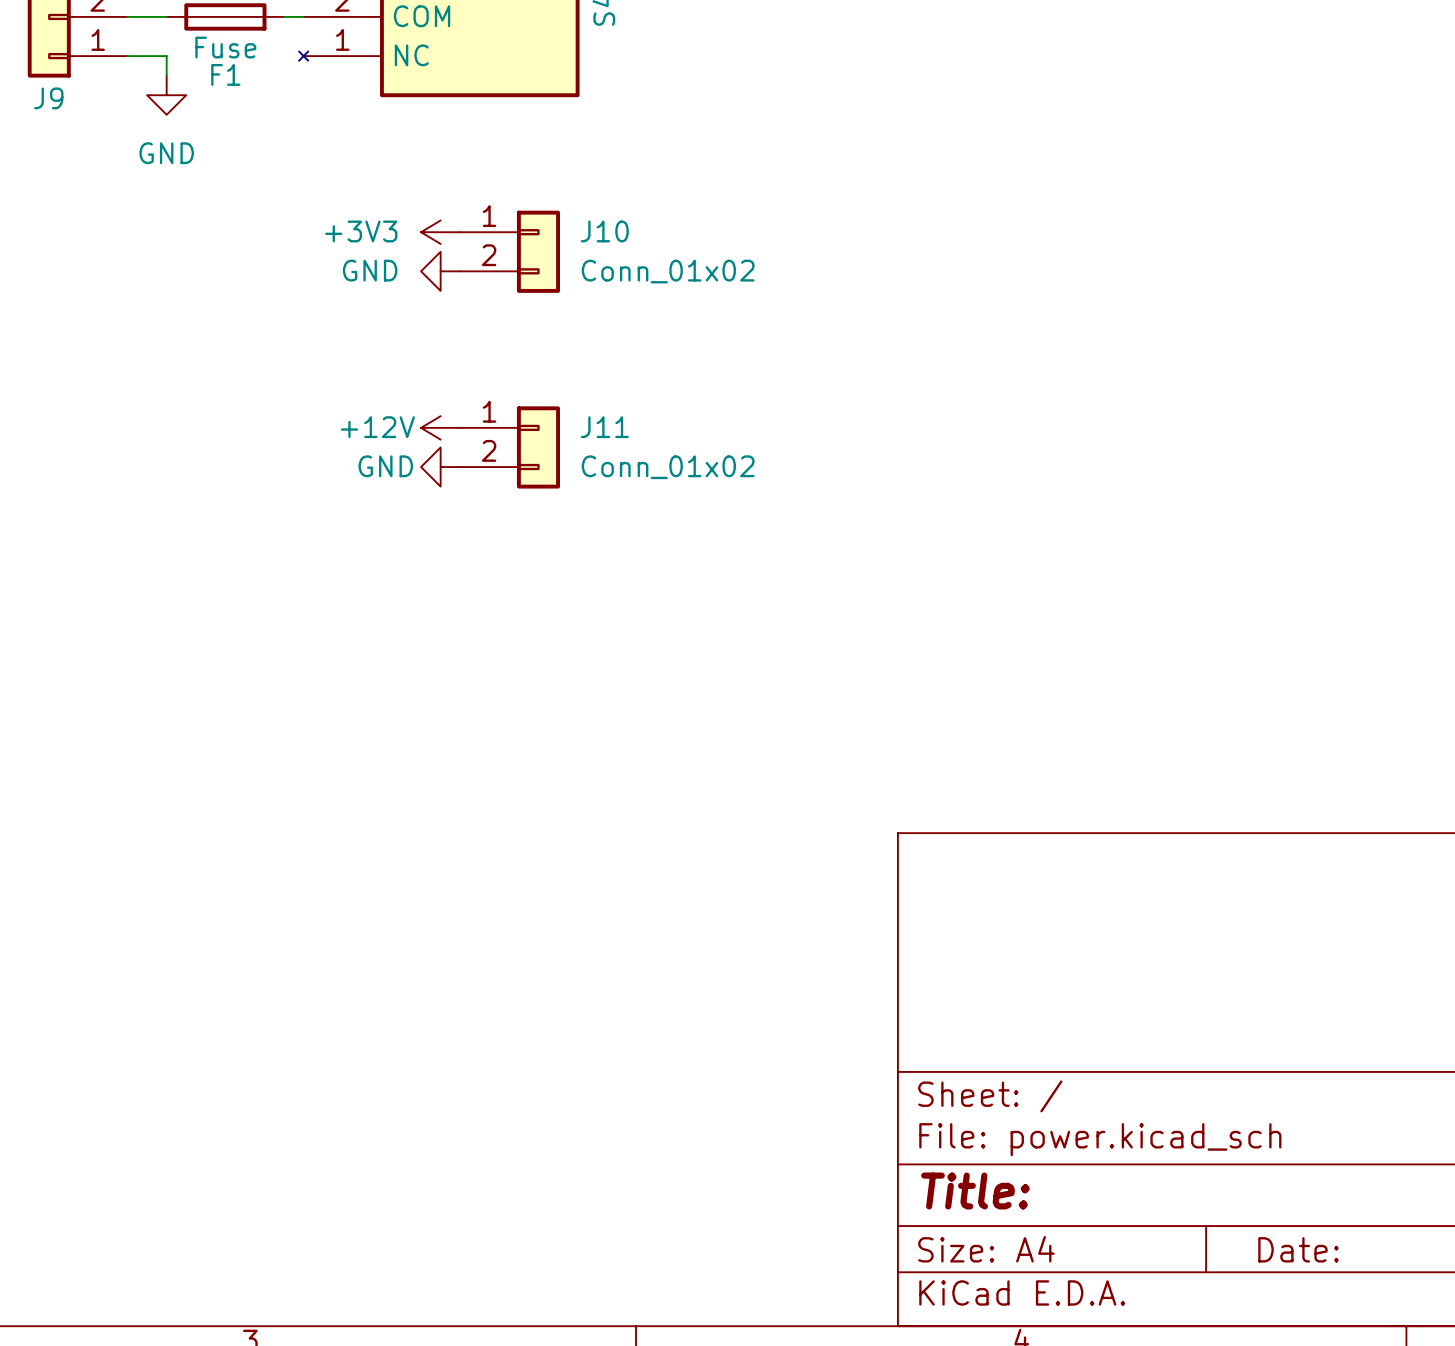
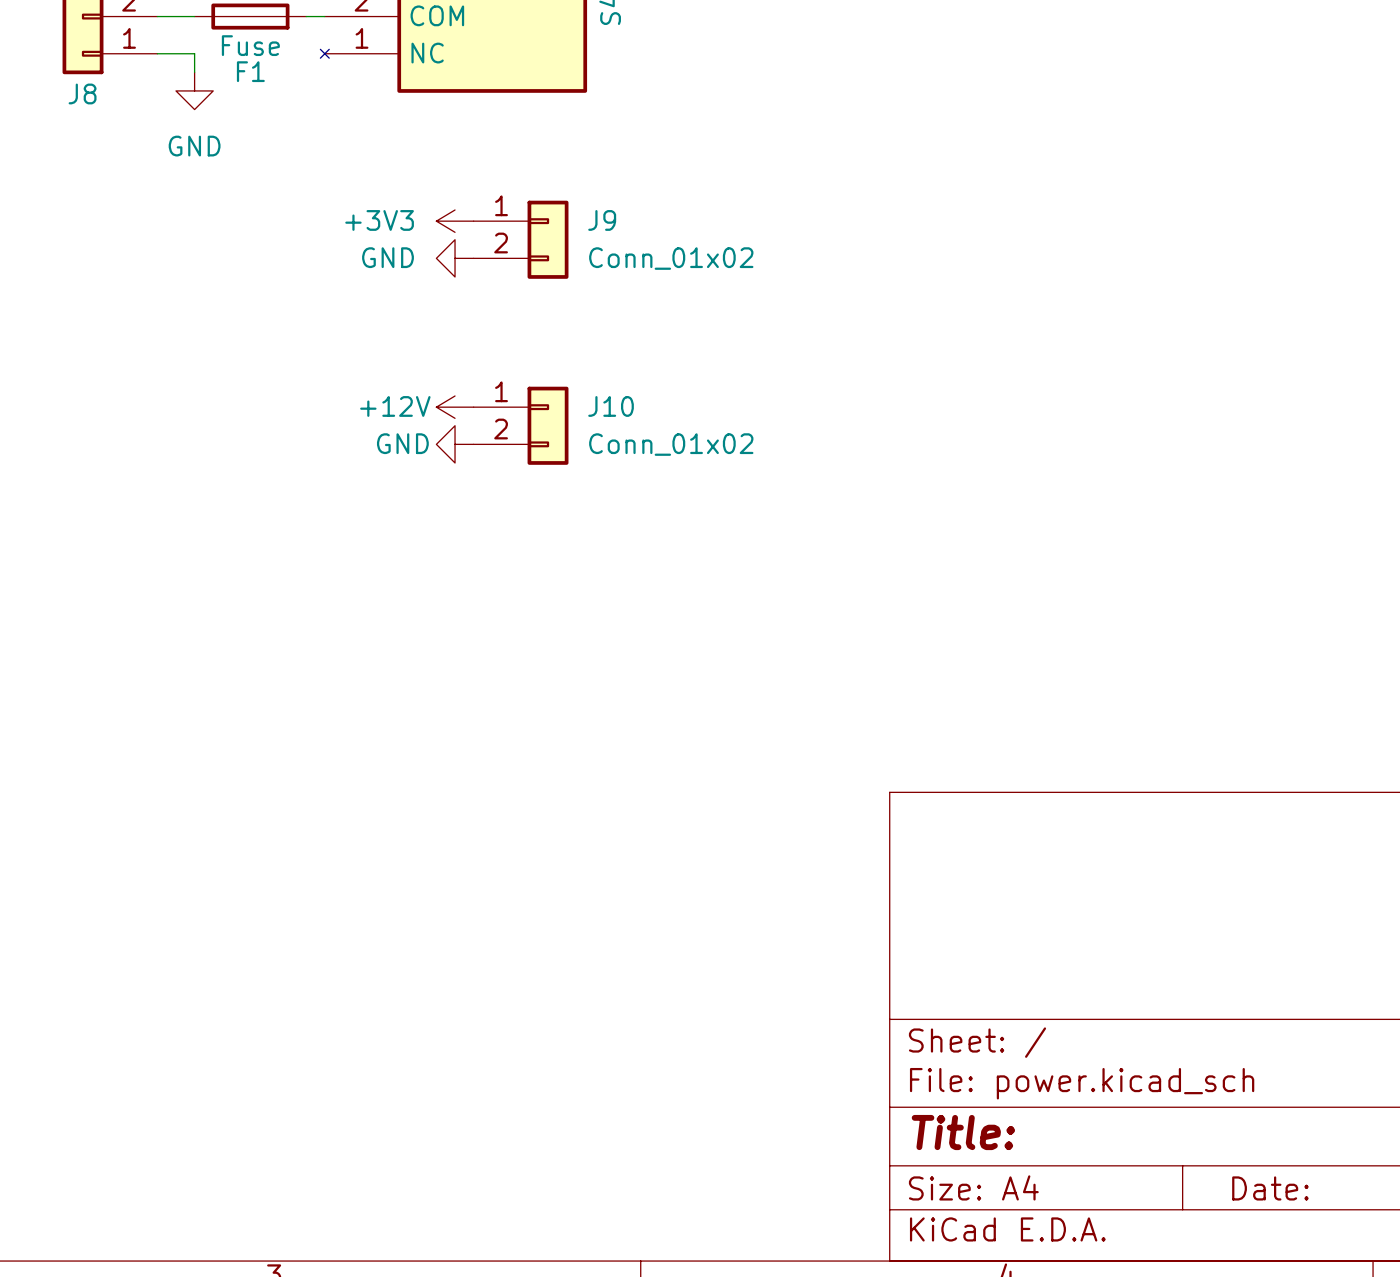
J9 name: J9 (48, 98) -> J8 (82, 93)
J10 name: J10 (604, 231) -> J9 (602, 220)
J11 name: J11 (604, 427) -> J10 (611, 406)

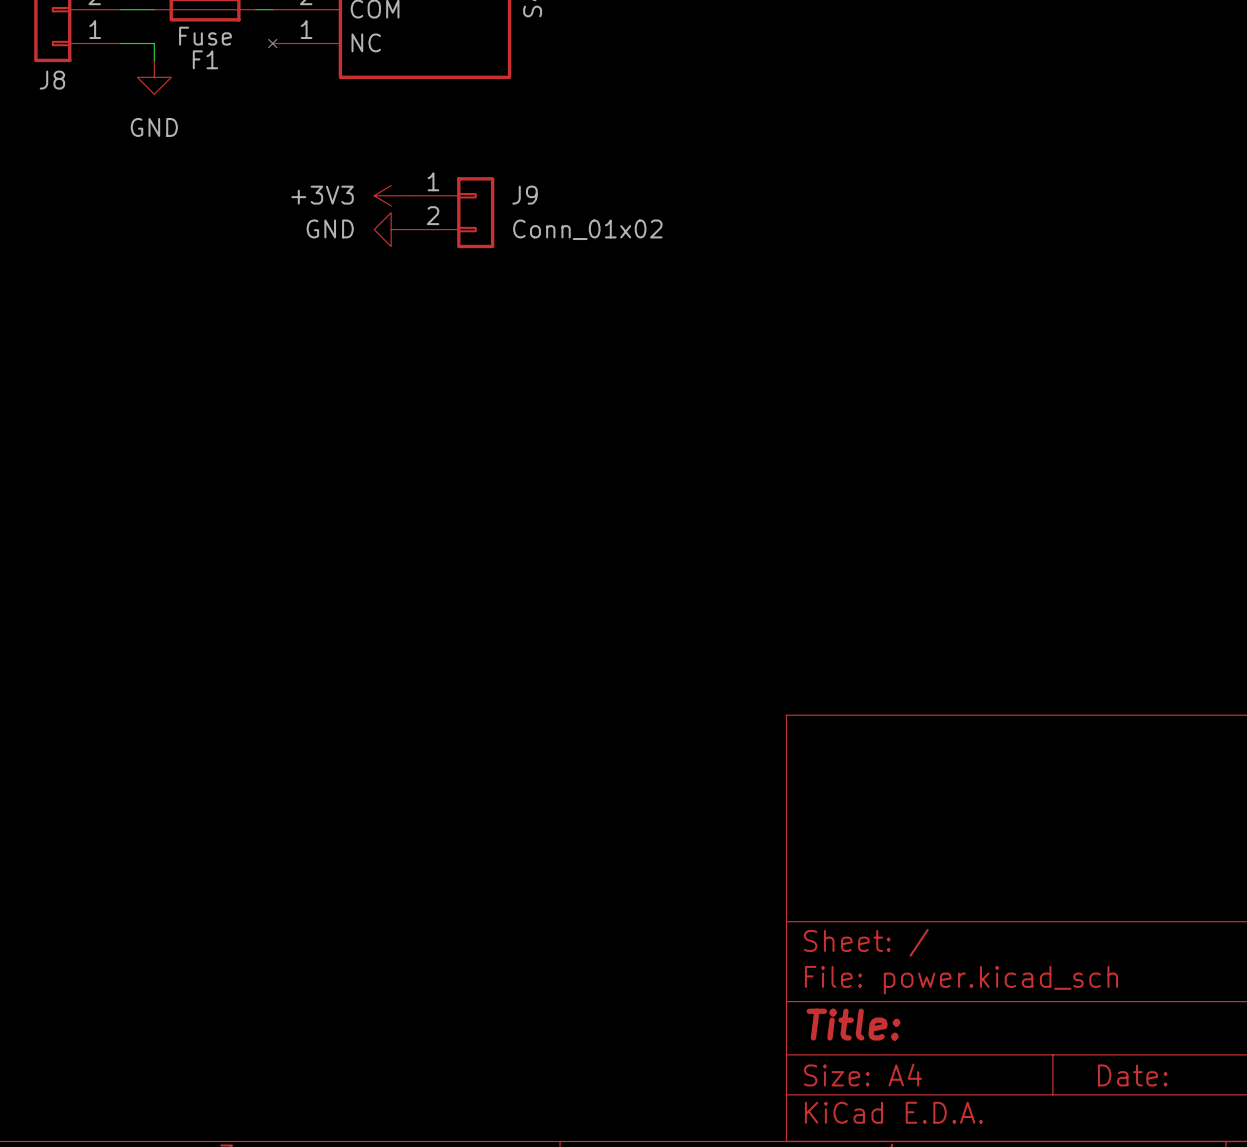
power symbol: +12V (455, 407) -> none
J10: Conn_01x02 (521, 425) -> none
power symbol: GND (455, 444) -> none

